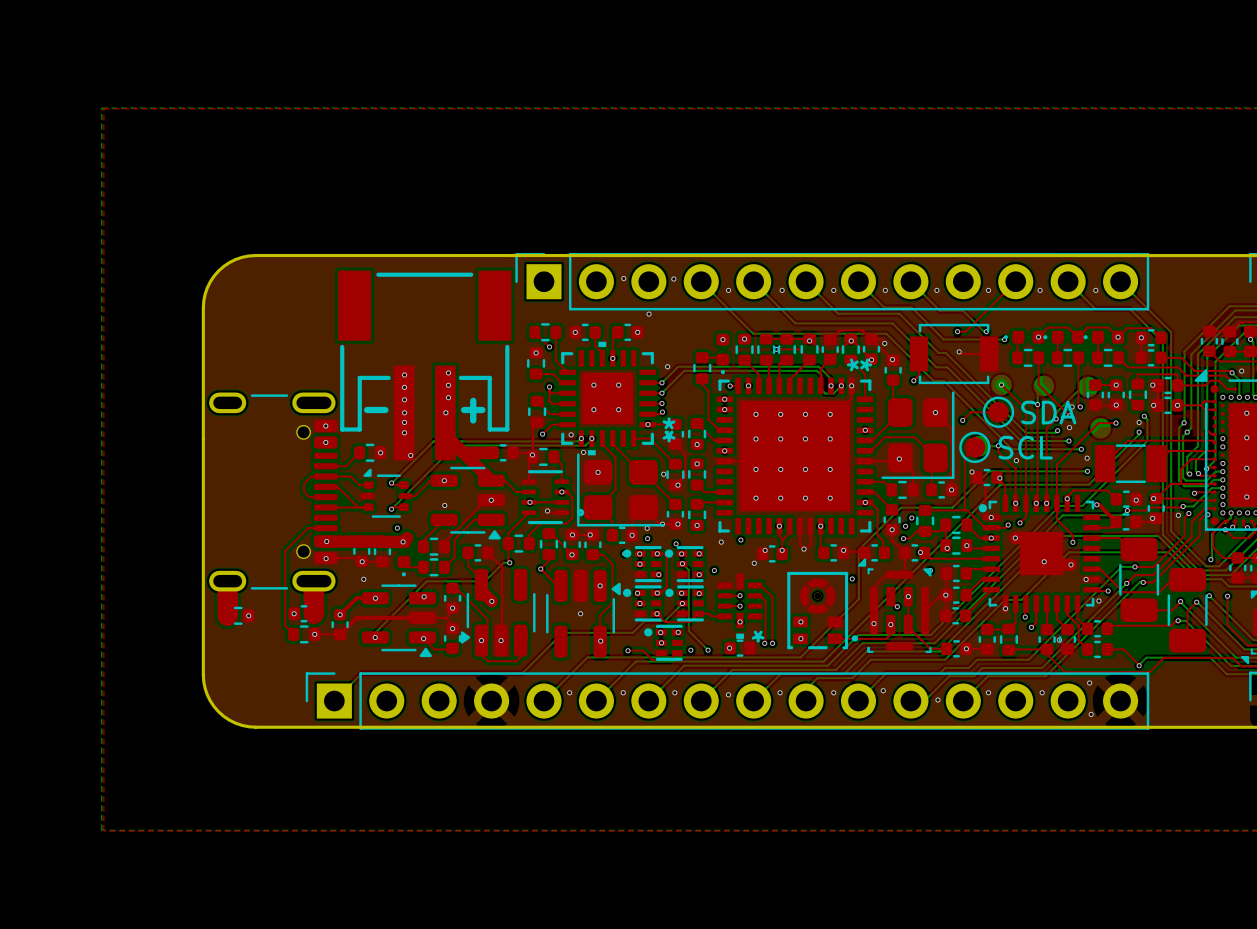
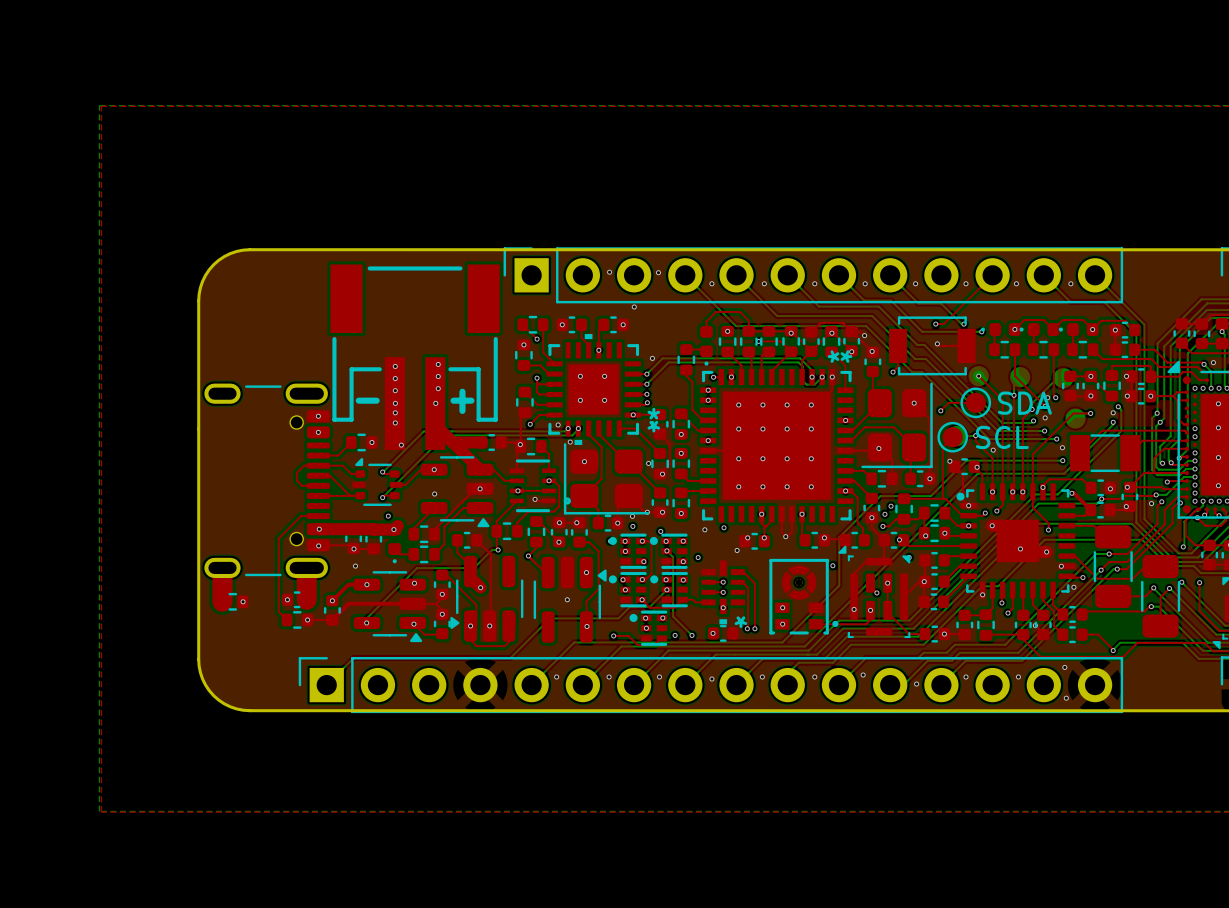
via: (722, 339) -> none
top track: none -> (748, 331) (748, 320) (740, 312) (716, 312) (706, 321) (706, 331)

